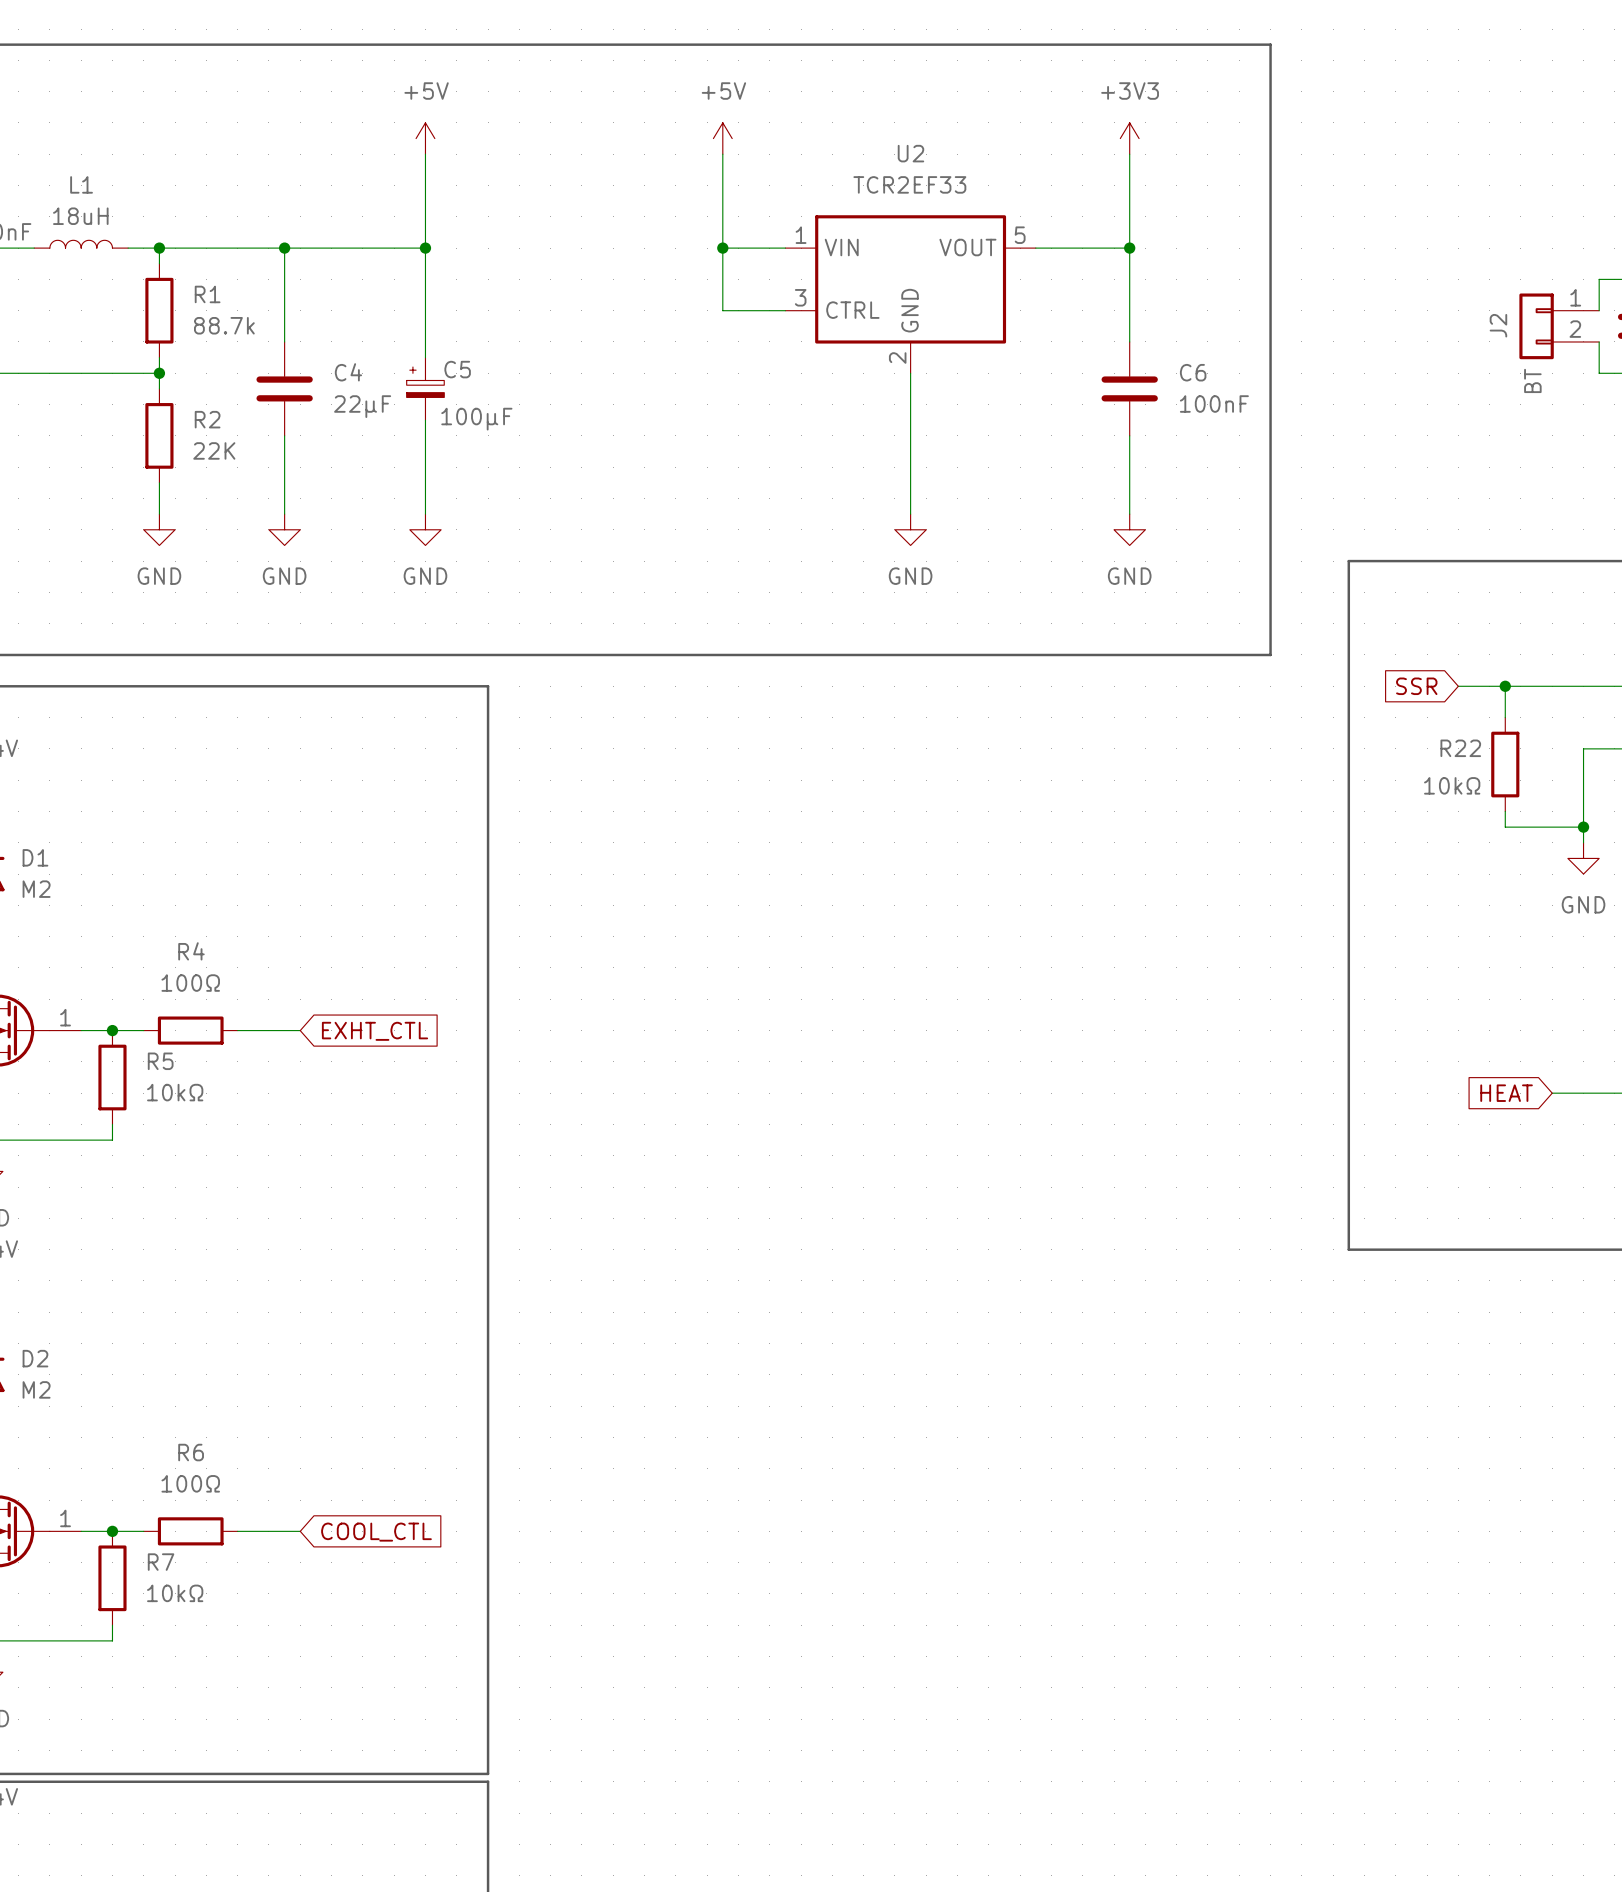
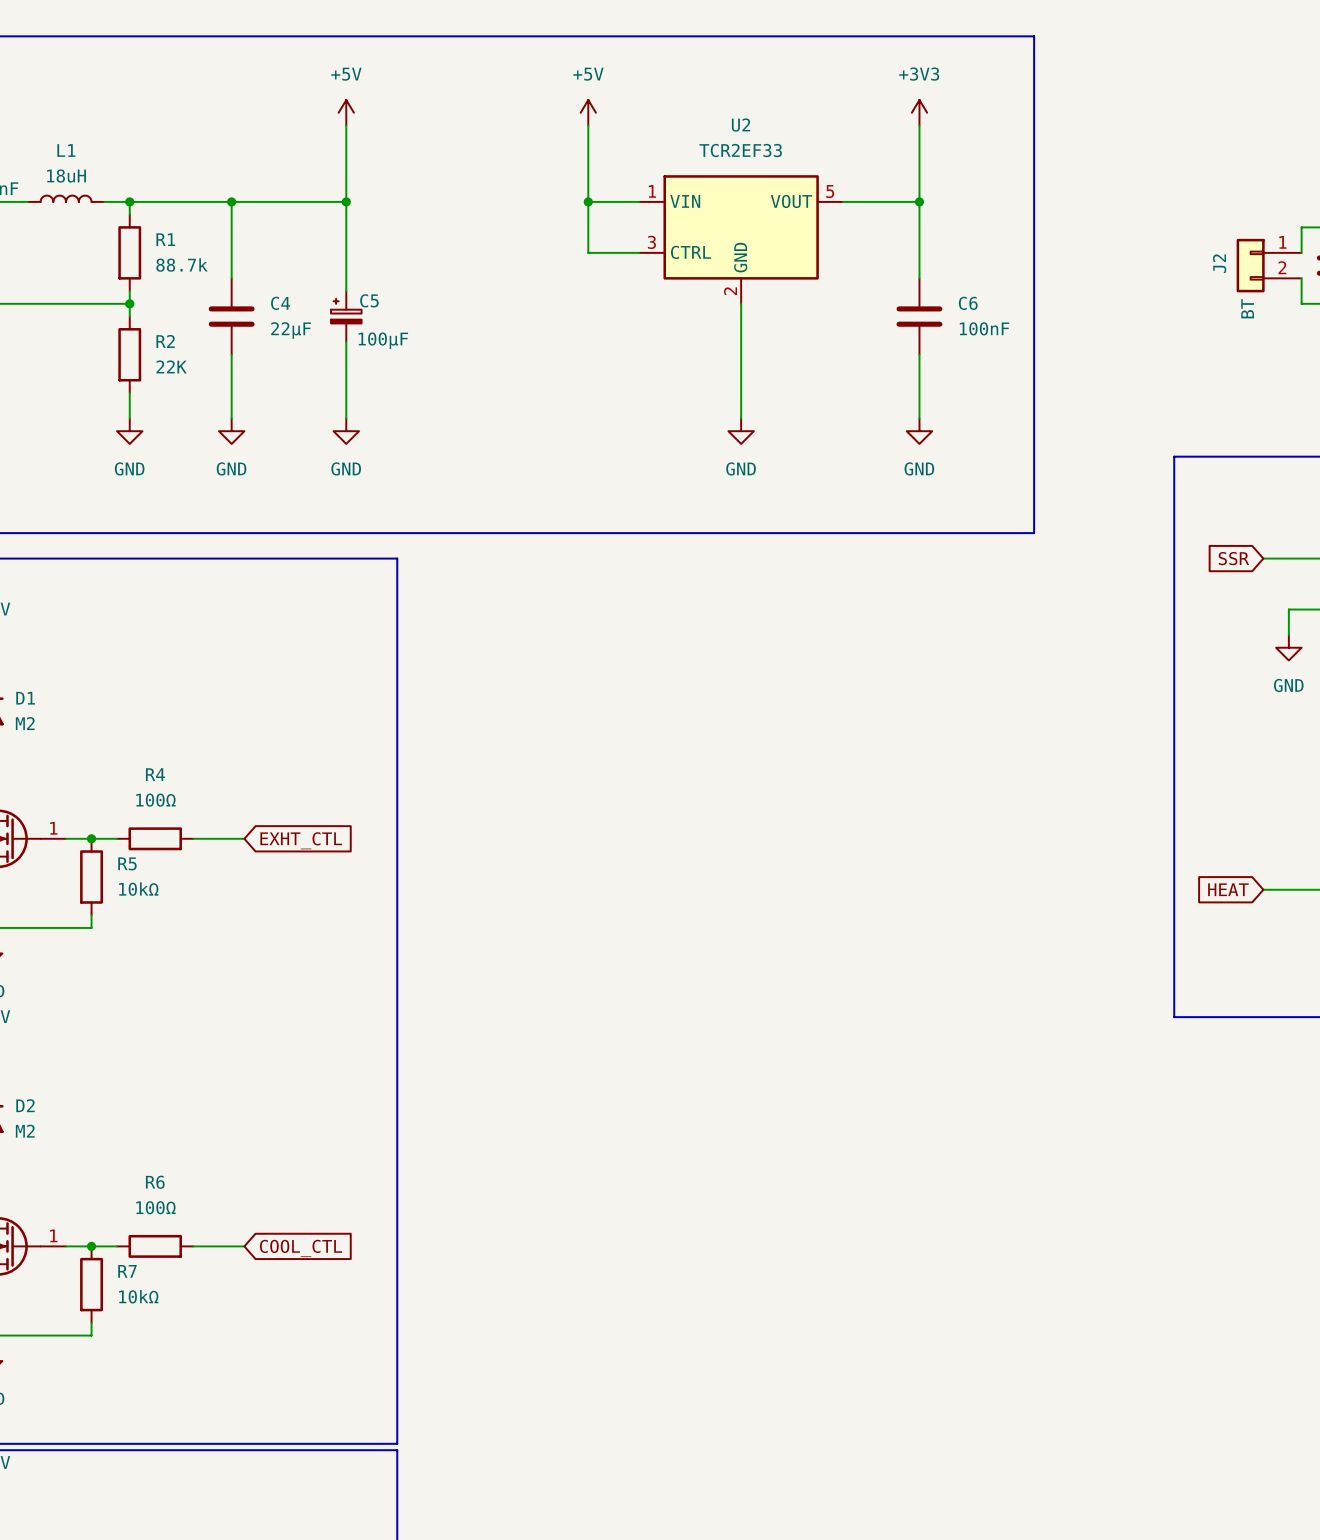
line: (1442, 561) (1348, 561) (1348, 1249) (1442, 1249) -> (1174, 456) (1174, 1017)
global label position: SSR (1416, 686) -> SSR (1233, 558)
wire: (1458, 686) (1552, 686) -> none
wire: (1505, 686) (1505, 717) -> none
junction: (1505, 686) -> none
R22: 10kΩ (1505, 764) -> none
wire: (1583, 780) (1583, 842) -> none
wire: (1505, 811) (1505, 827) (1583, 827) -> none
junction: (1583, 827) -> none
power symbol position: GND (1583, 858) -> GND (1288, 647)

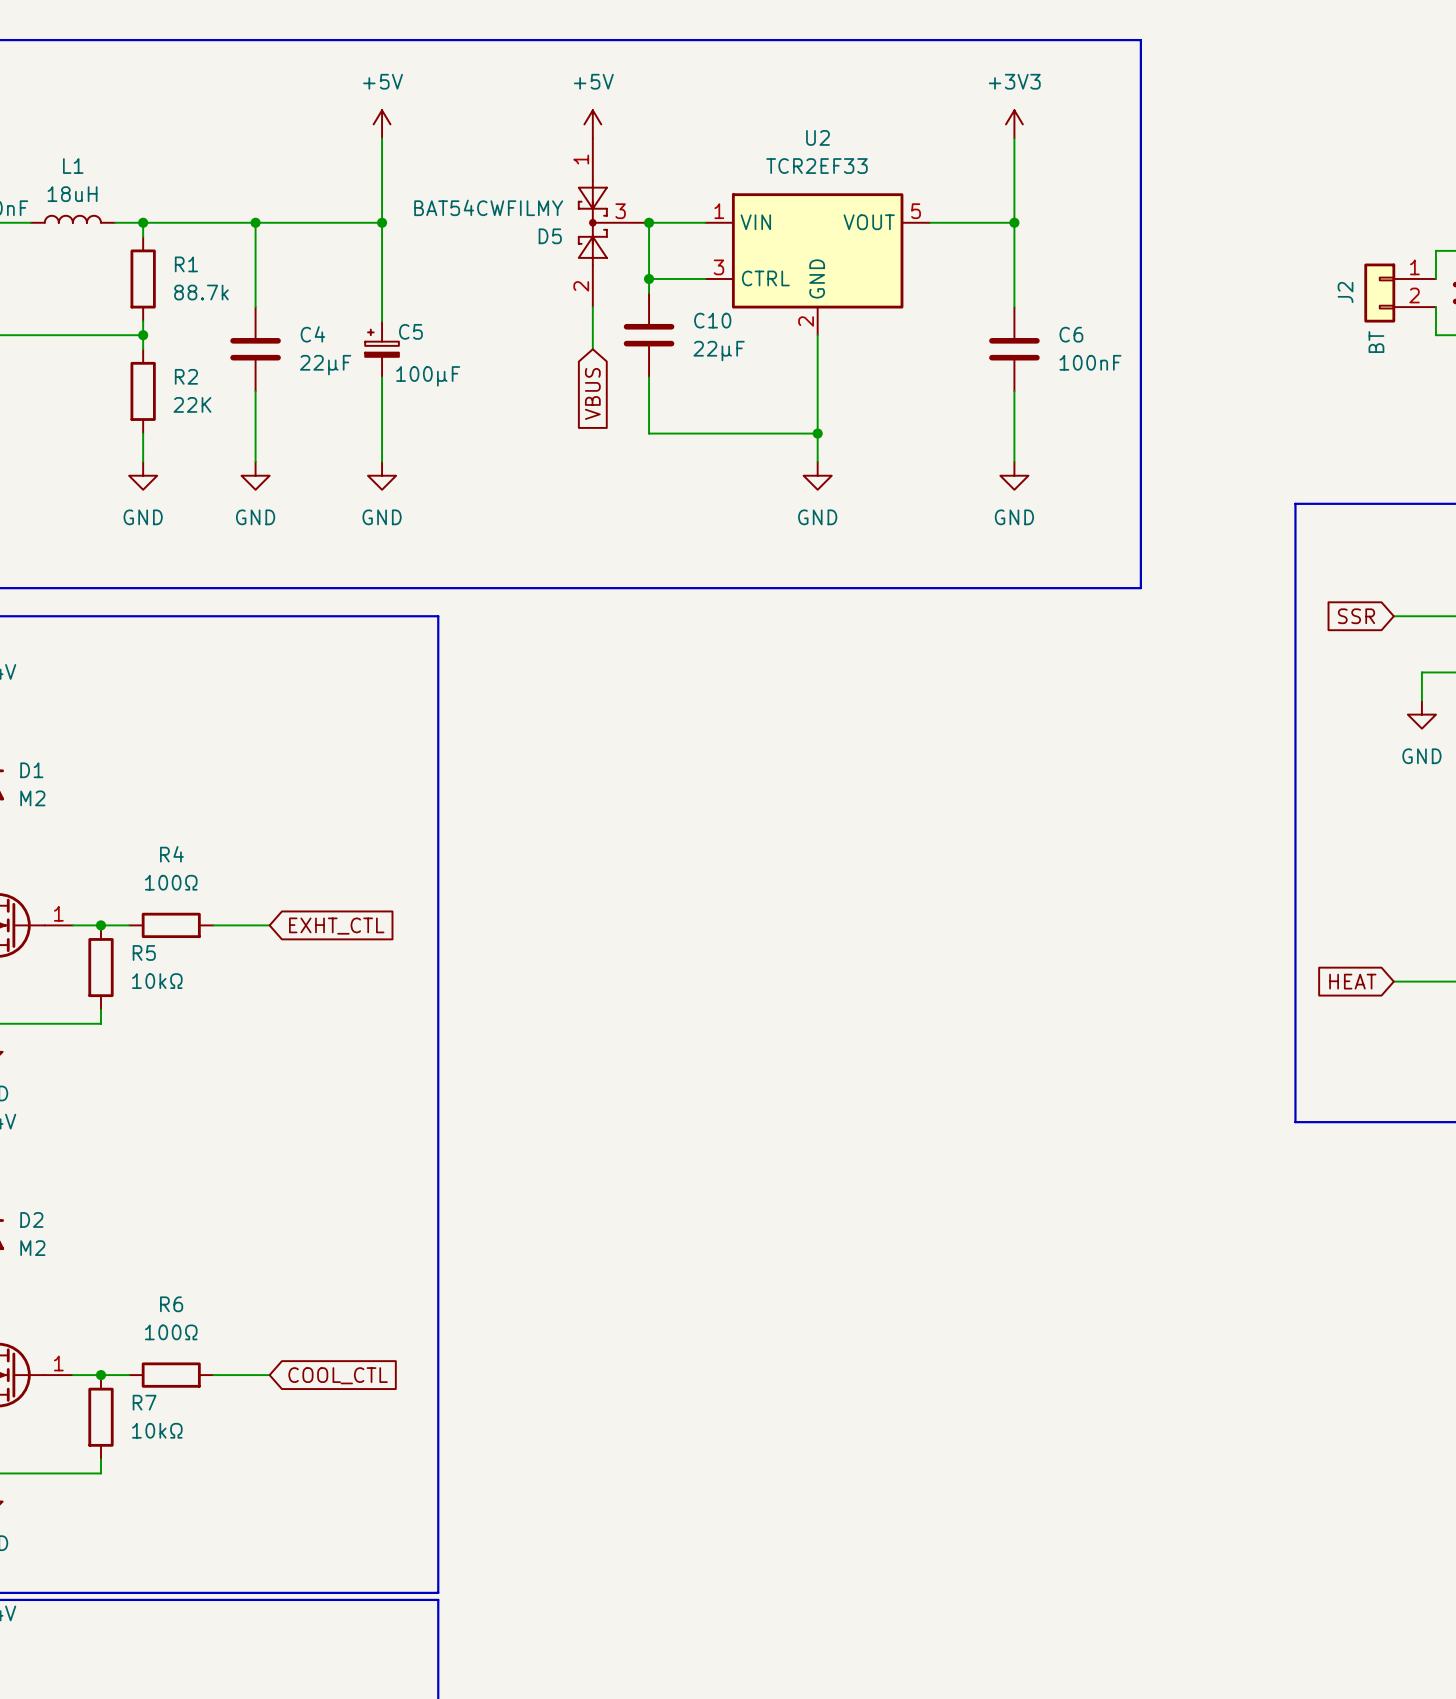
power symbol position: +5V (588, 112) -> +5V (592, 124)
wire: (588, 125) (588, 201) -> none
D5: none -> BAT54CWFILMY (613, 222)
wire: none -> (649, 278) (649, 293)
junction: none -> (649, 278)
wire: none -> (592, 307) (592, 349)
C10: none -> 22µF (649, 335)
wire: none -> (649, 377) (649, 433) (817, 433)
global label: none -> VBUS (592, 393)
junction: none -> (817, 433)

